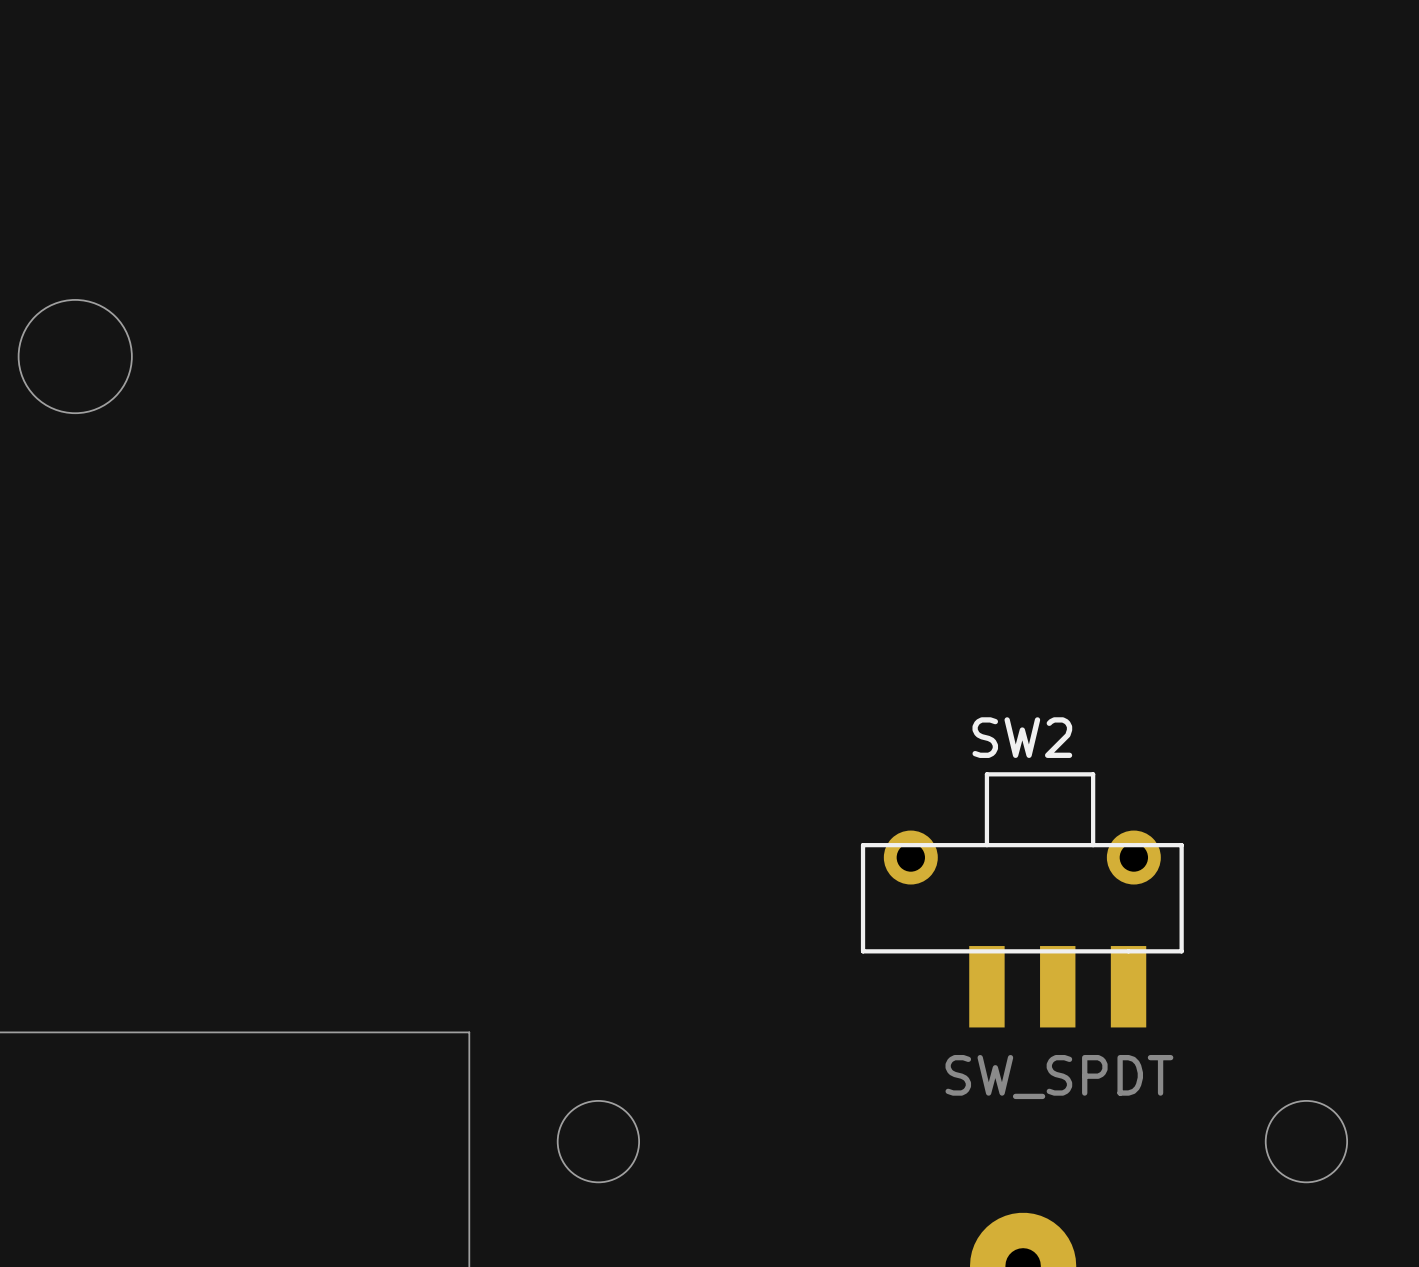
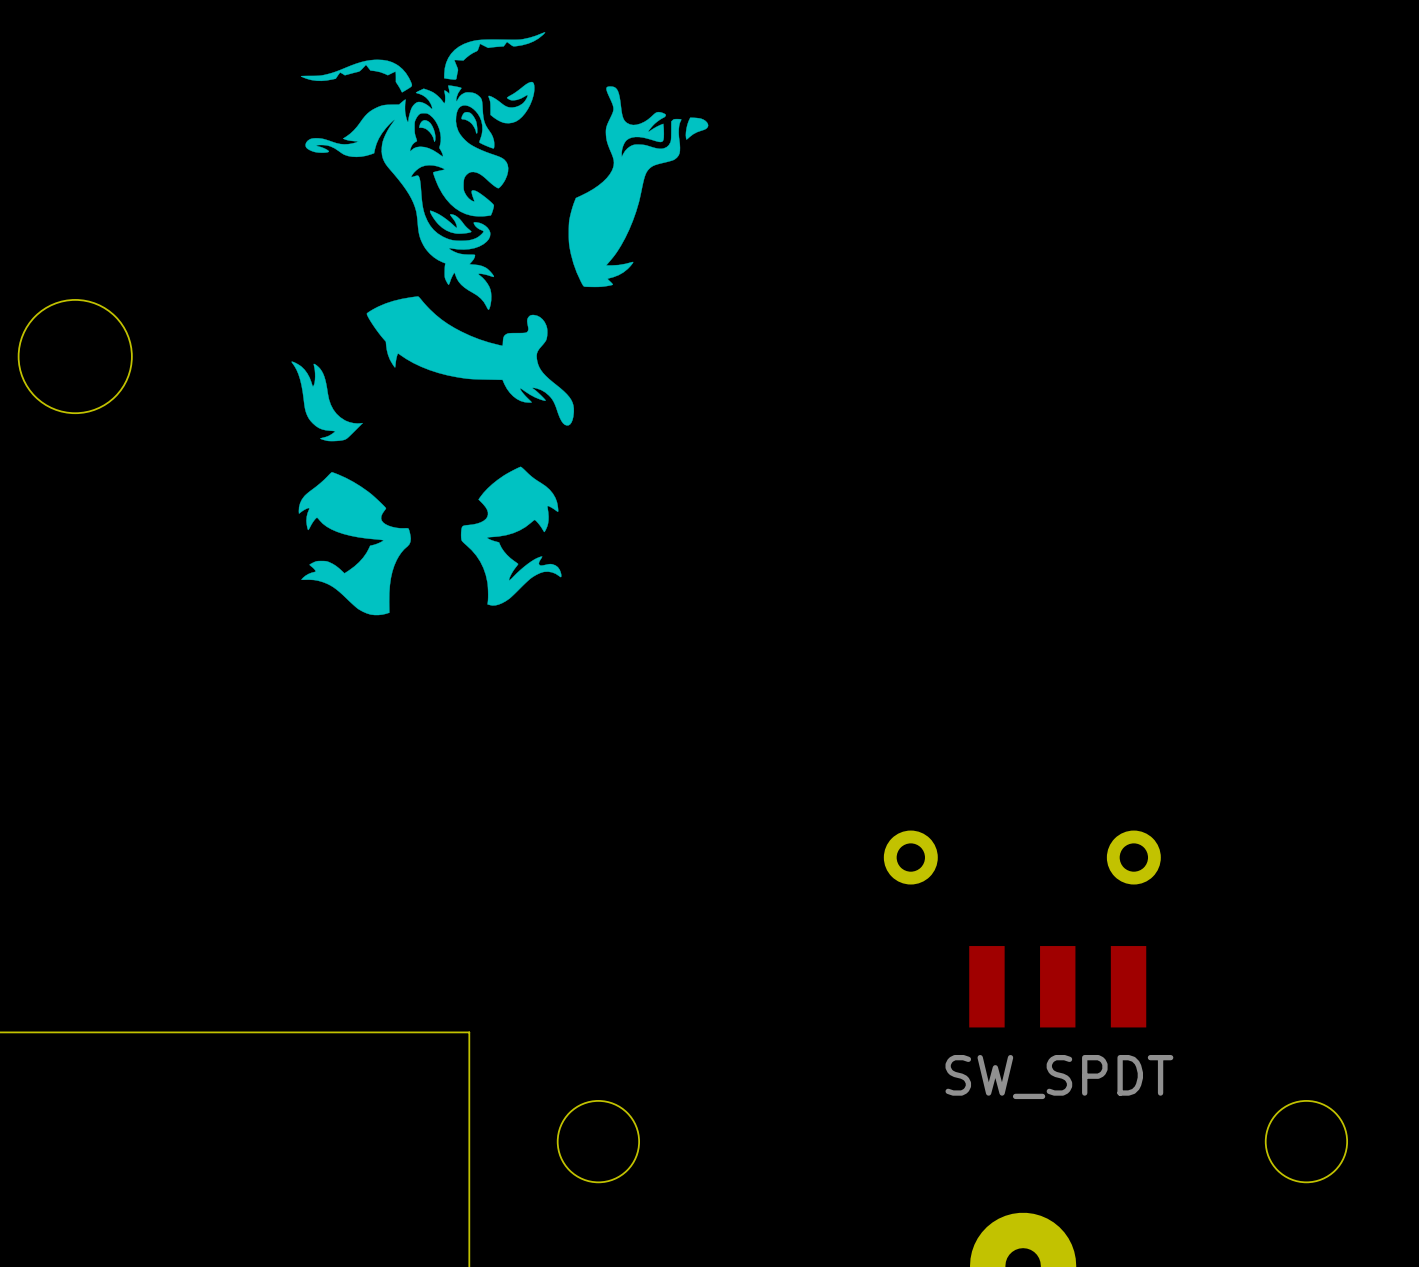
drawing: none -> [291, 32, 709, 616]
SW2: SW_SPDT (1022, 899) -> none
part: none -> SW_SPDT (1022, 929)

